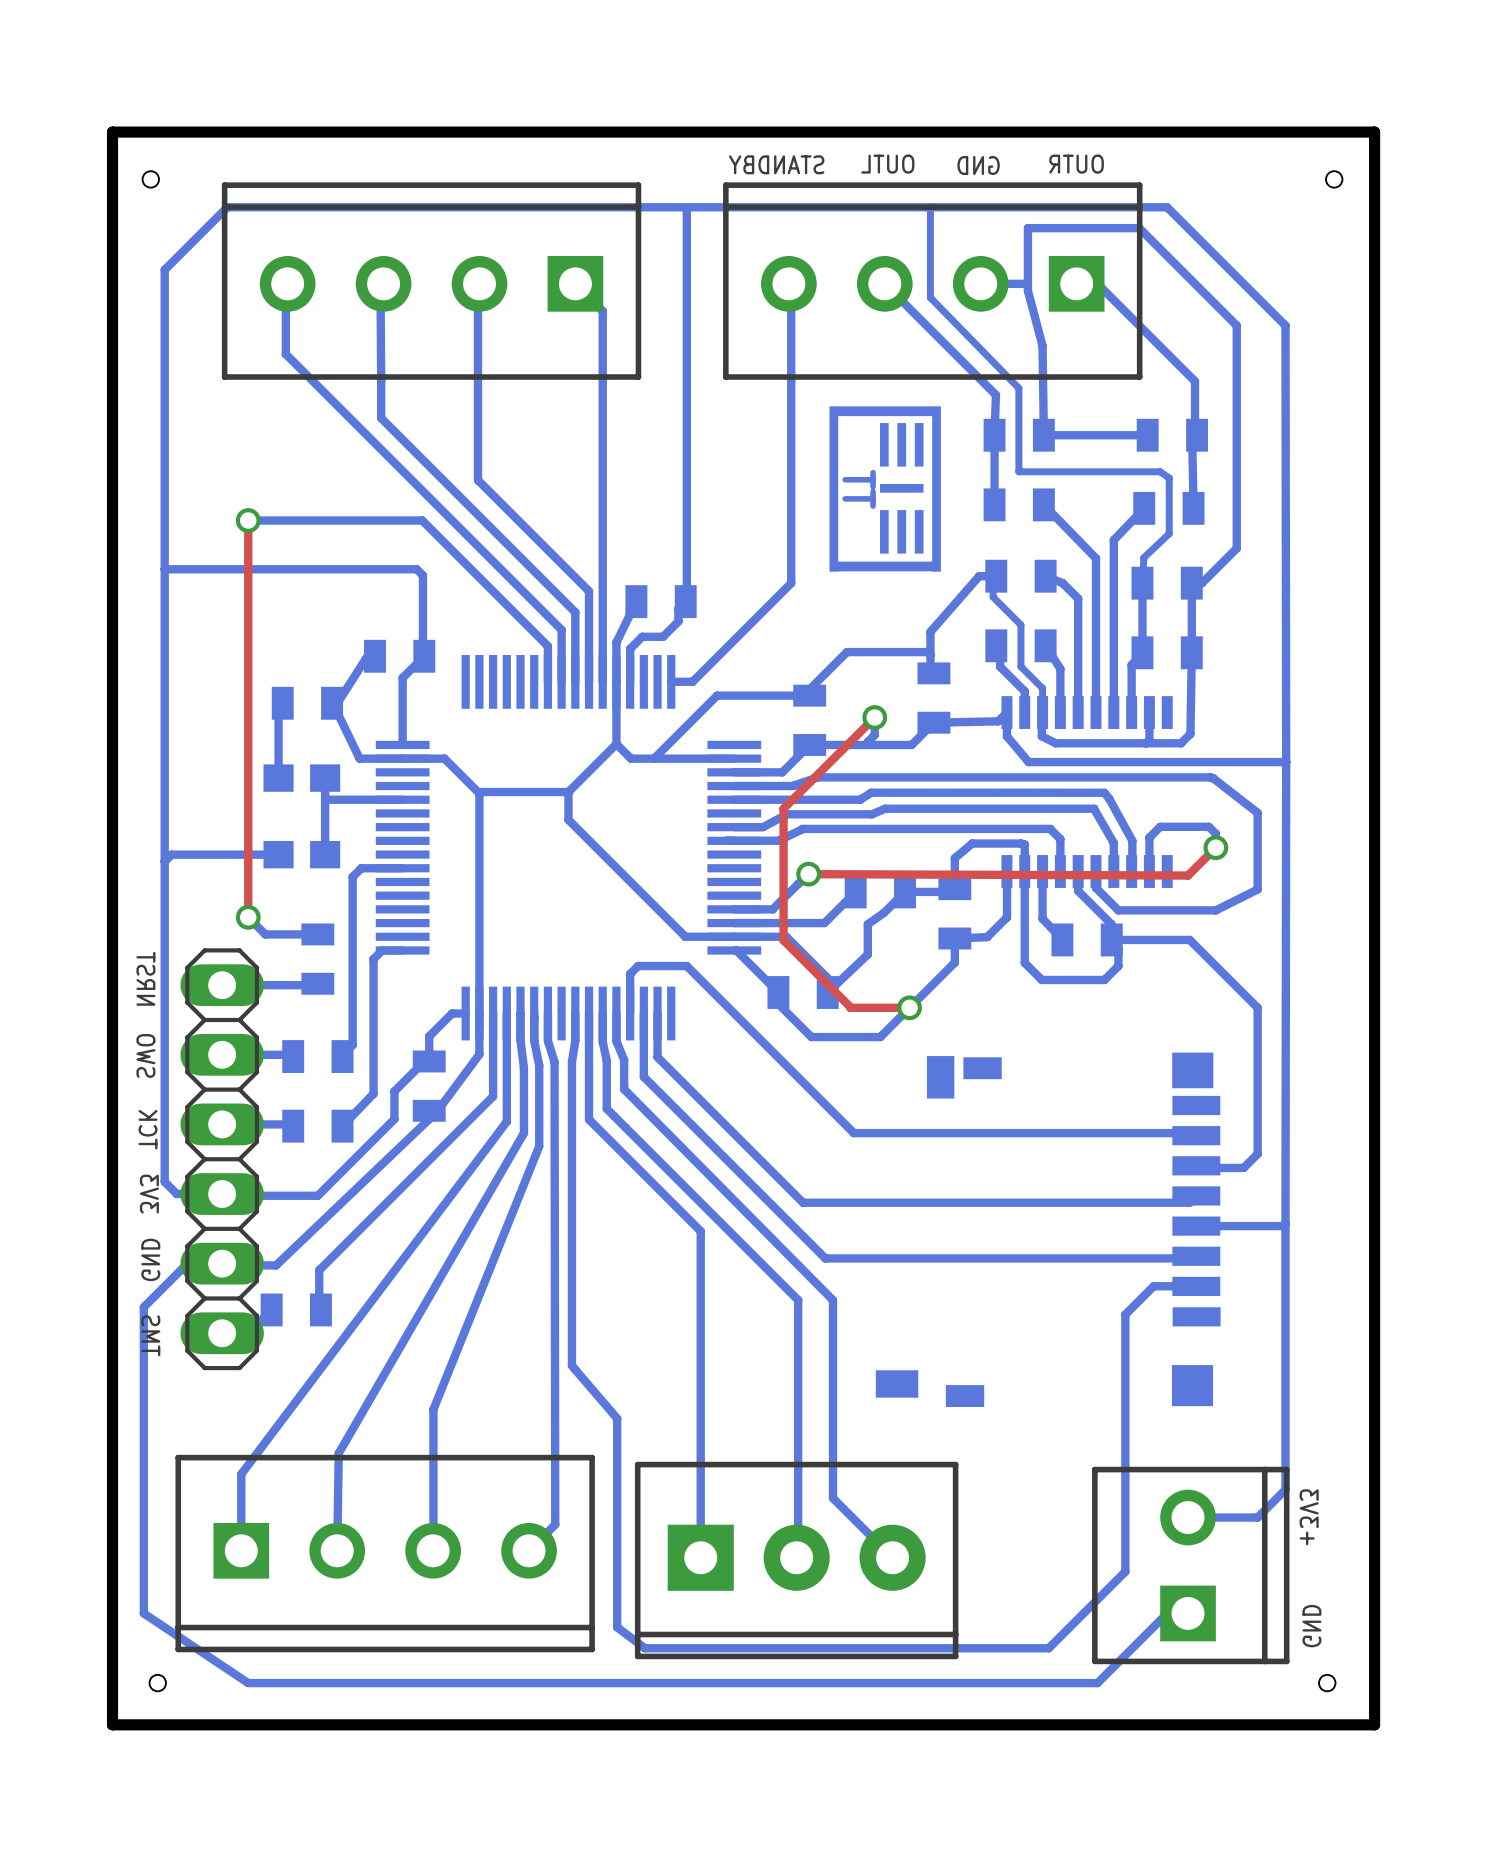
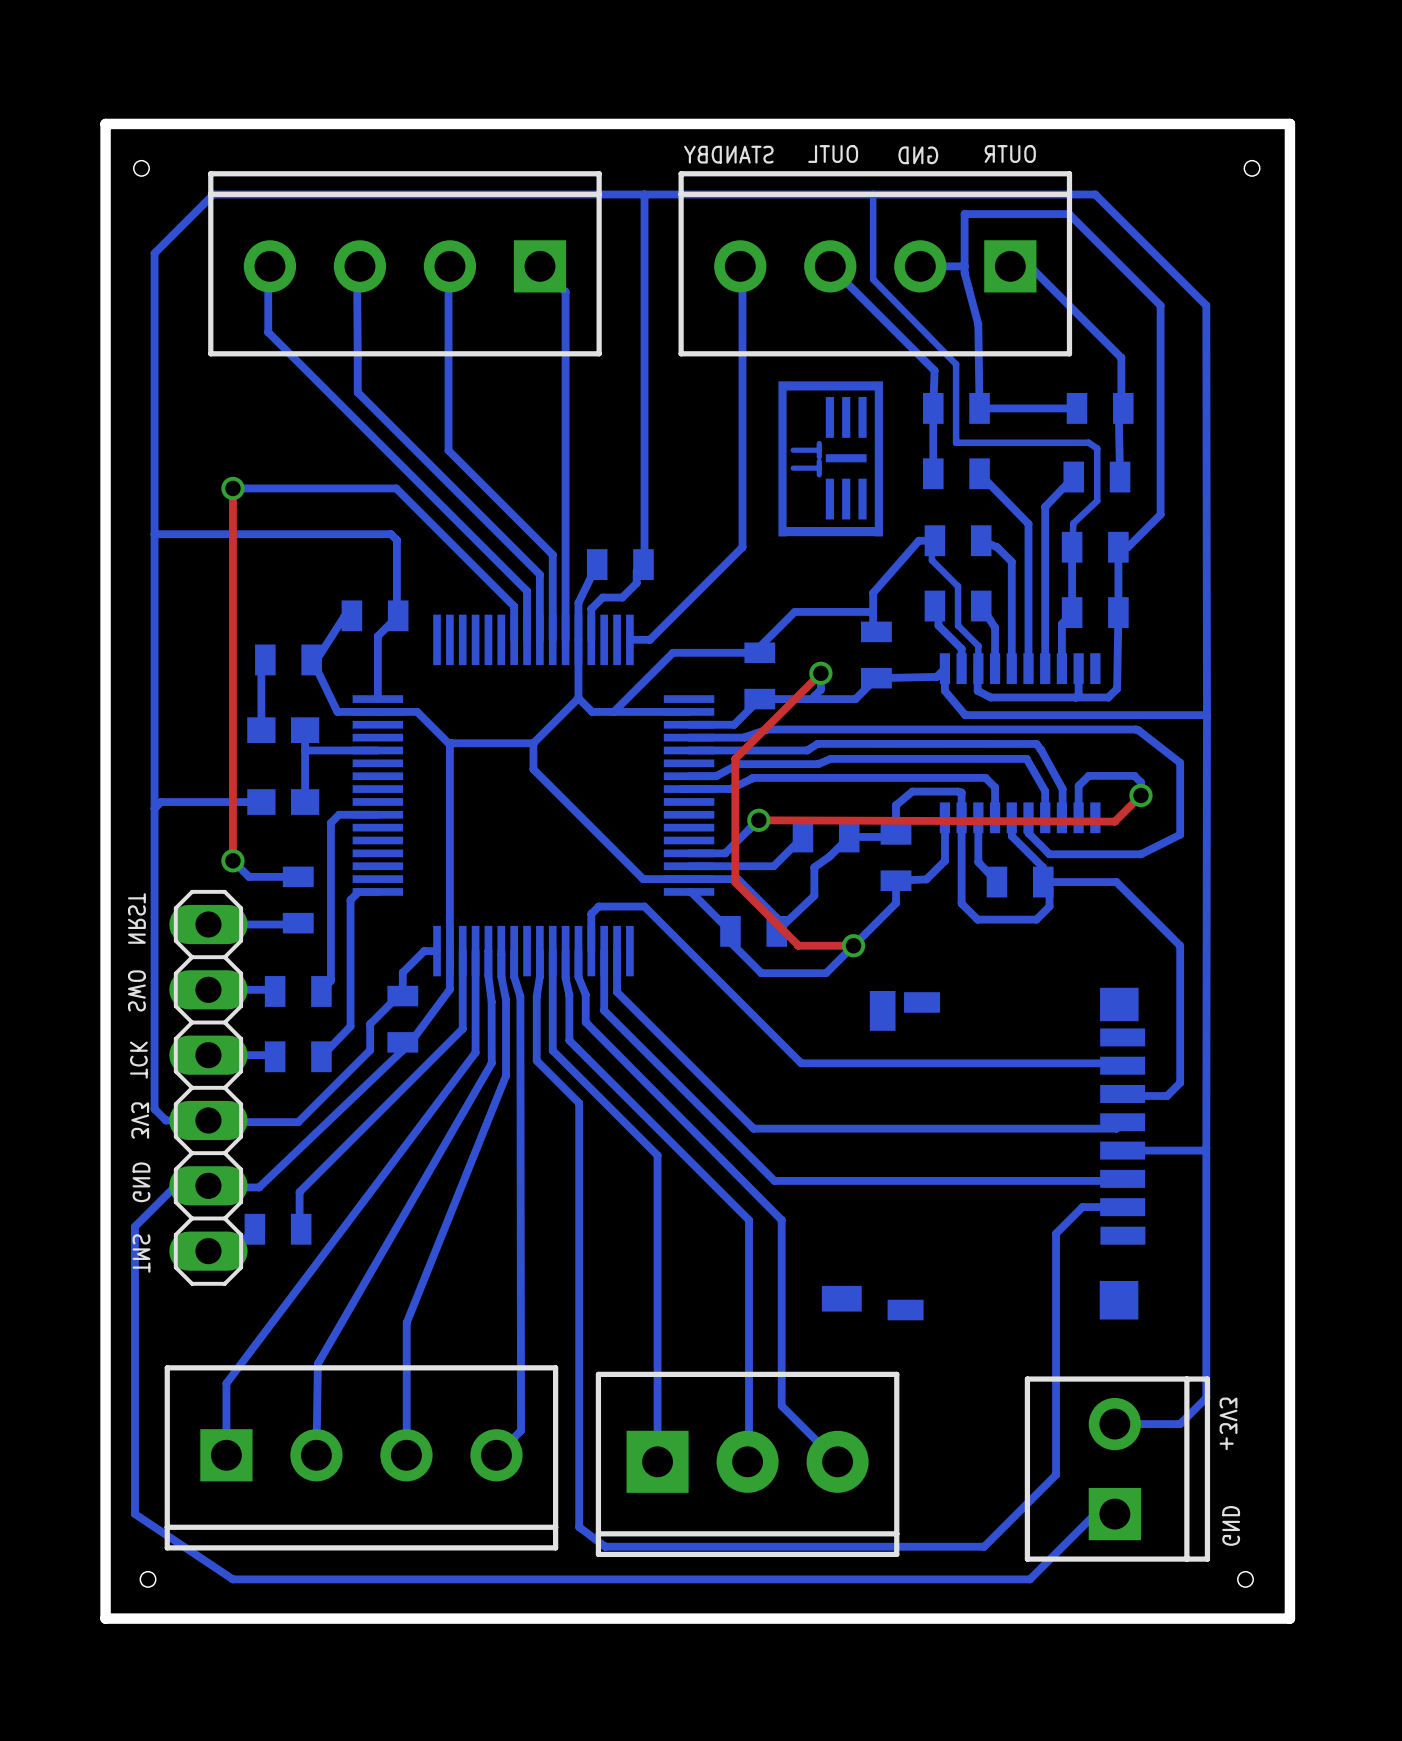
bottom track: (571, 1130) (571, 1365) (617, 1418) -> (536, 1060) (579, 1103) (579, 1331)

